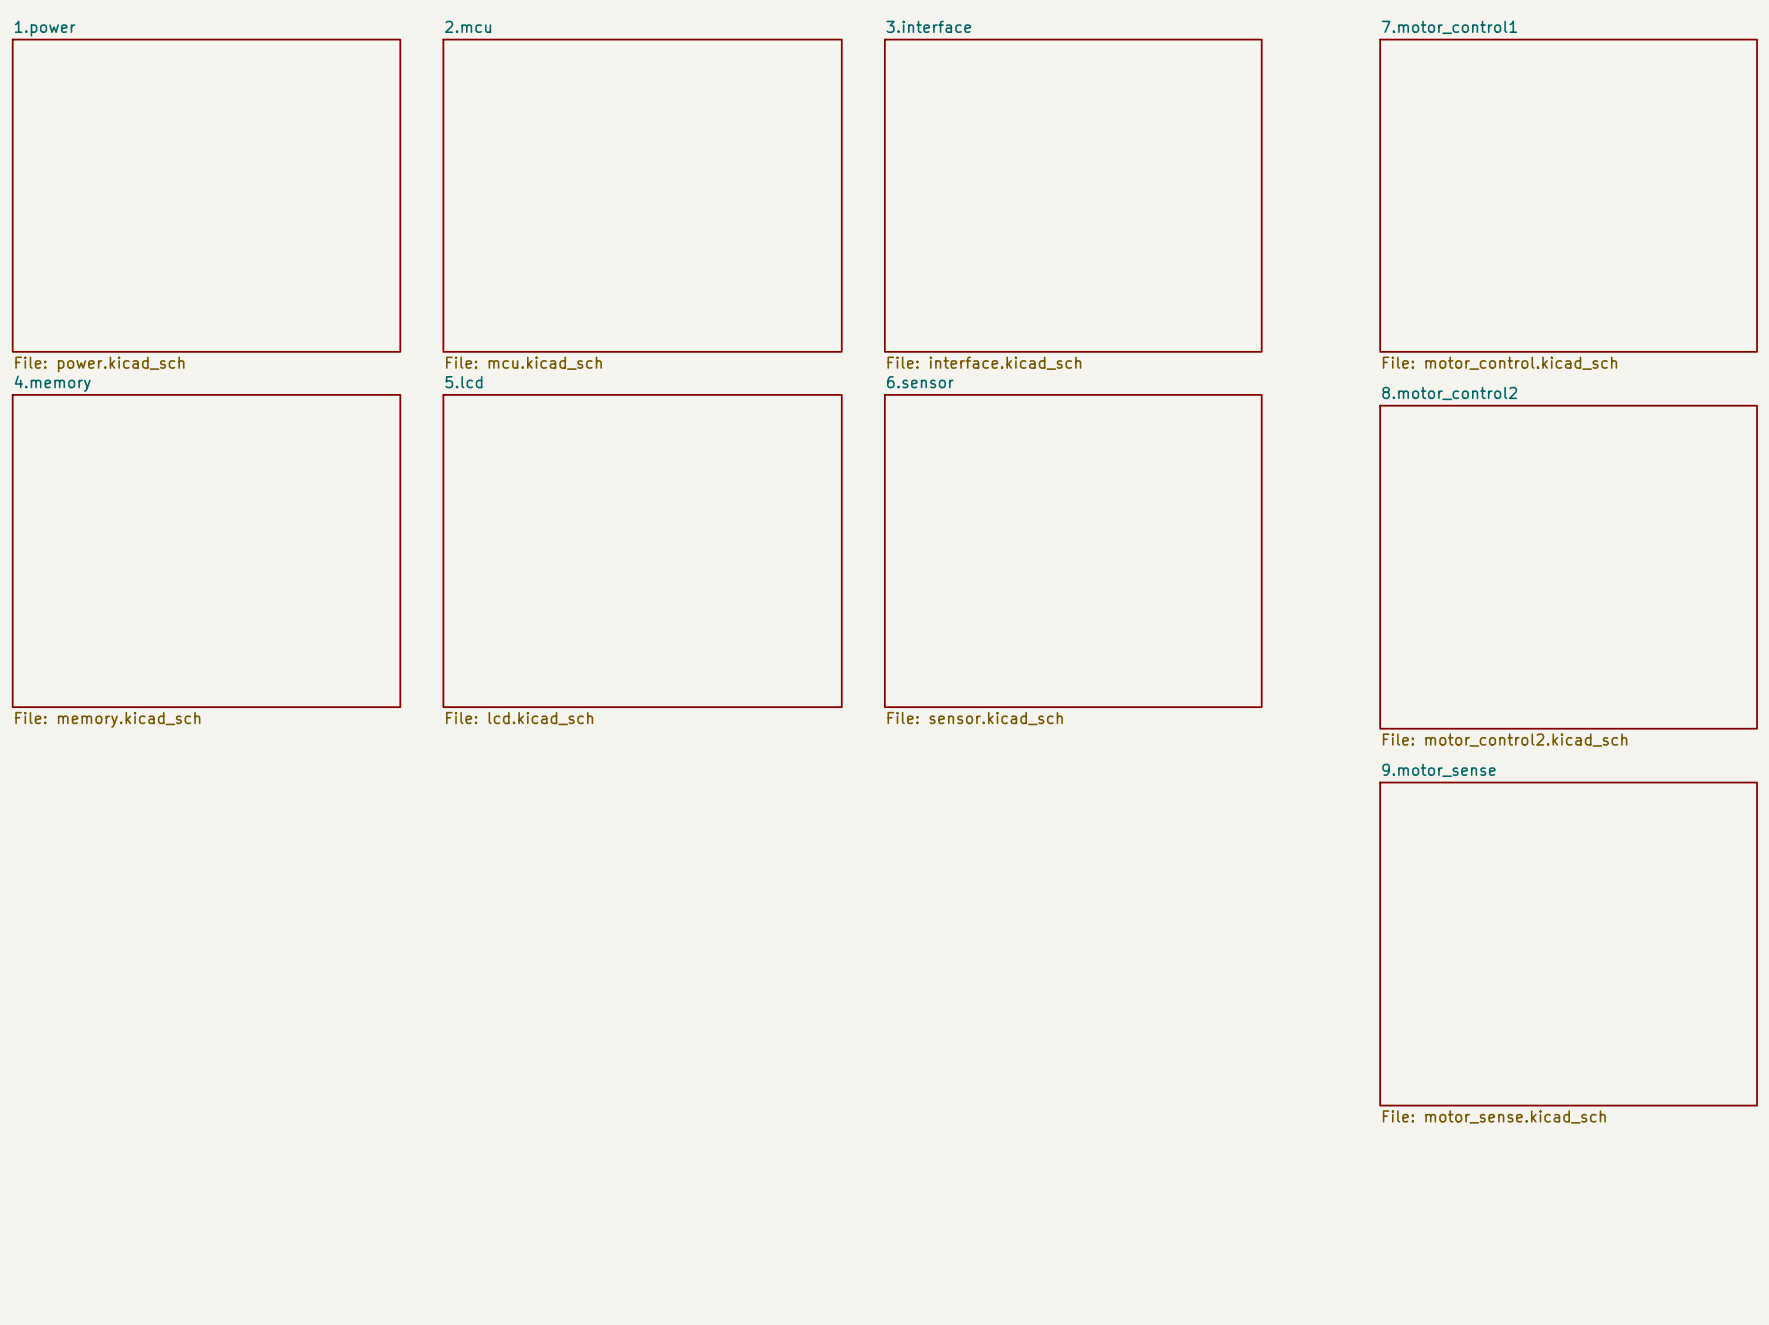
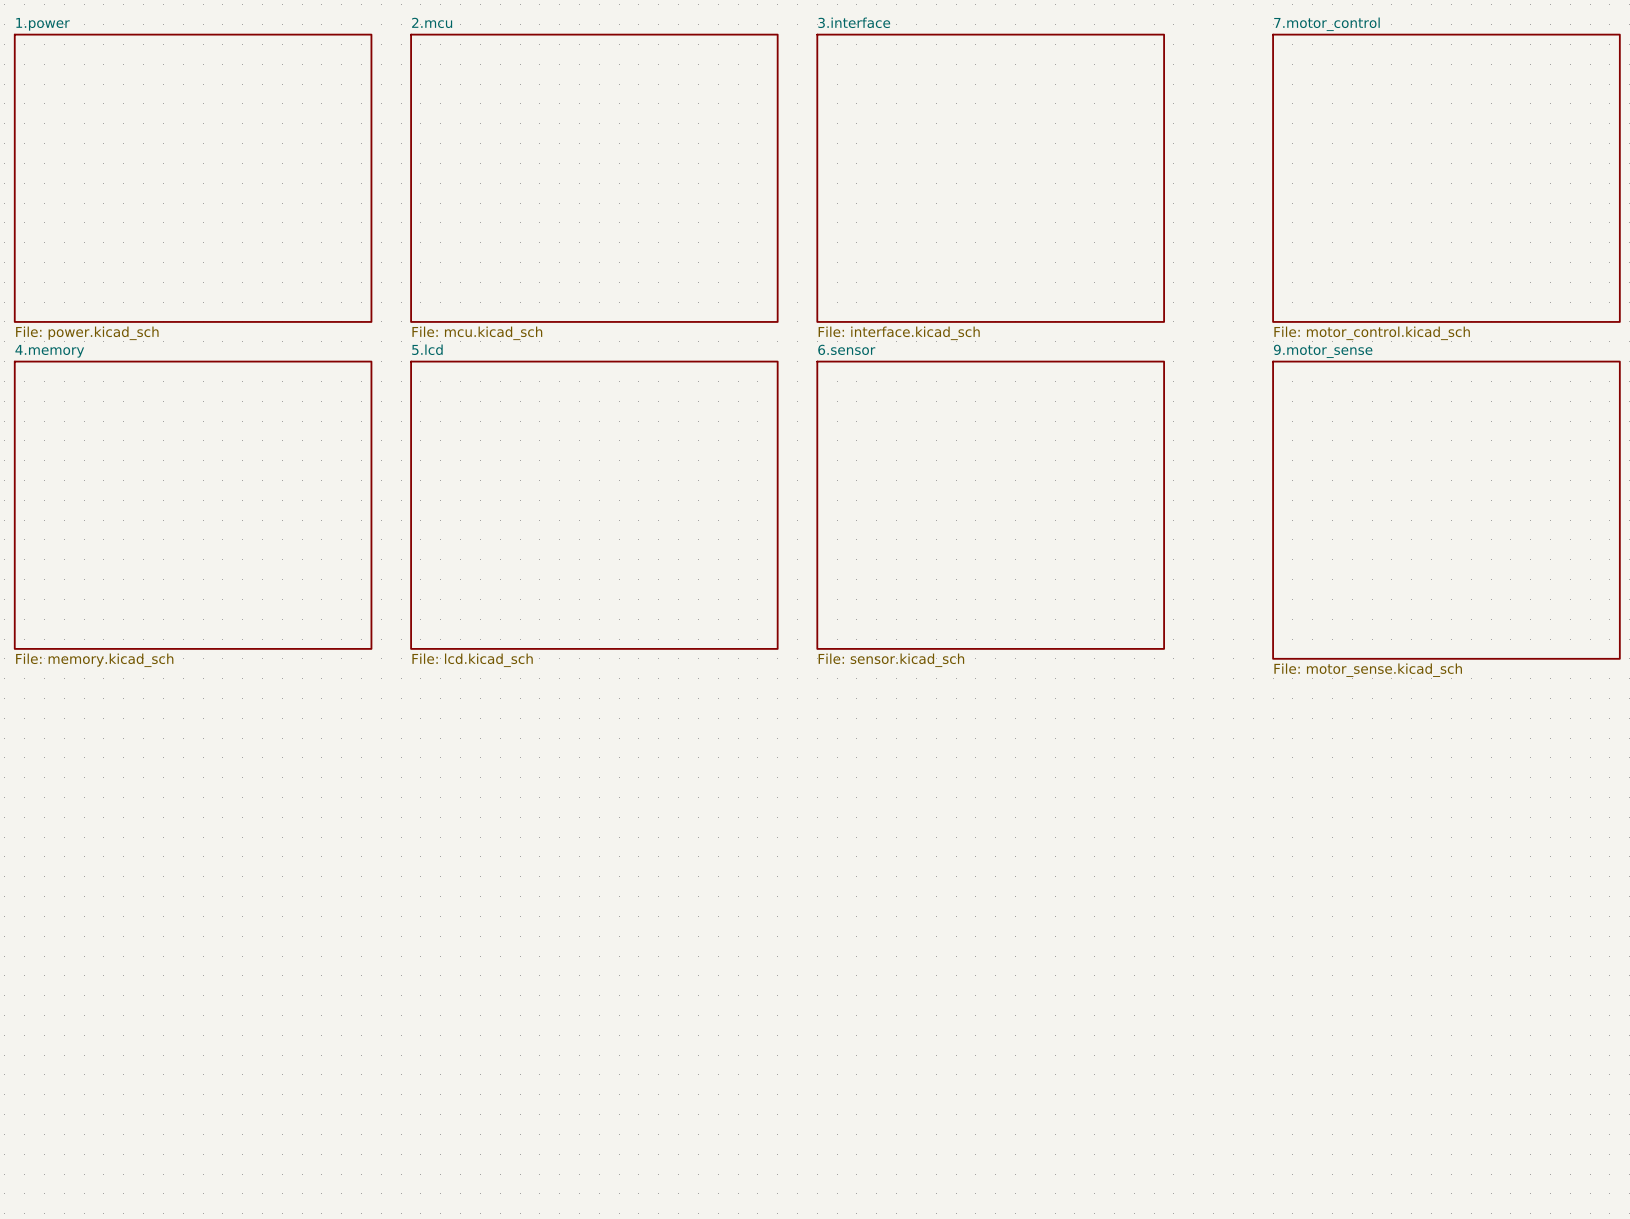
sheet 7.motor_control1 name: 7.motor_control1 (1449, 27) -> 7.motor_control (1326, 24)
sheet 8.motor_control2: File: motor_control2.kicad_sch (1568, 567) -> none
sheet 9.motor_sense position: (1568, 944) -> (1446, 510)

